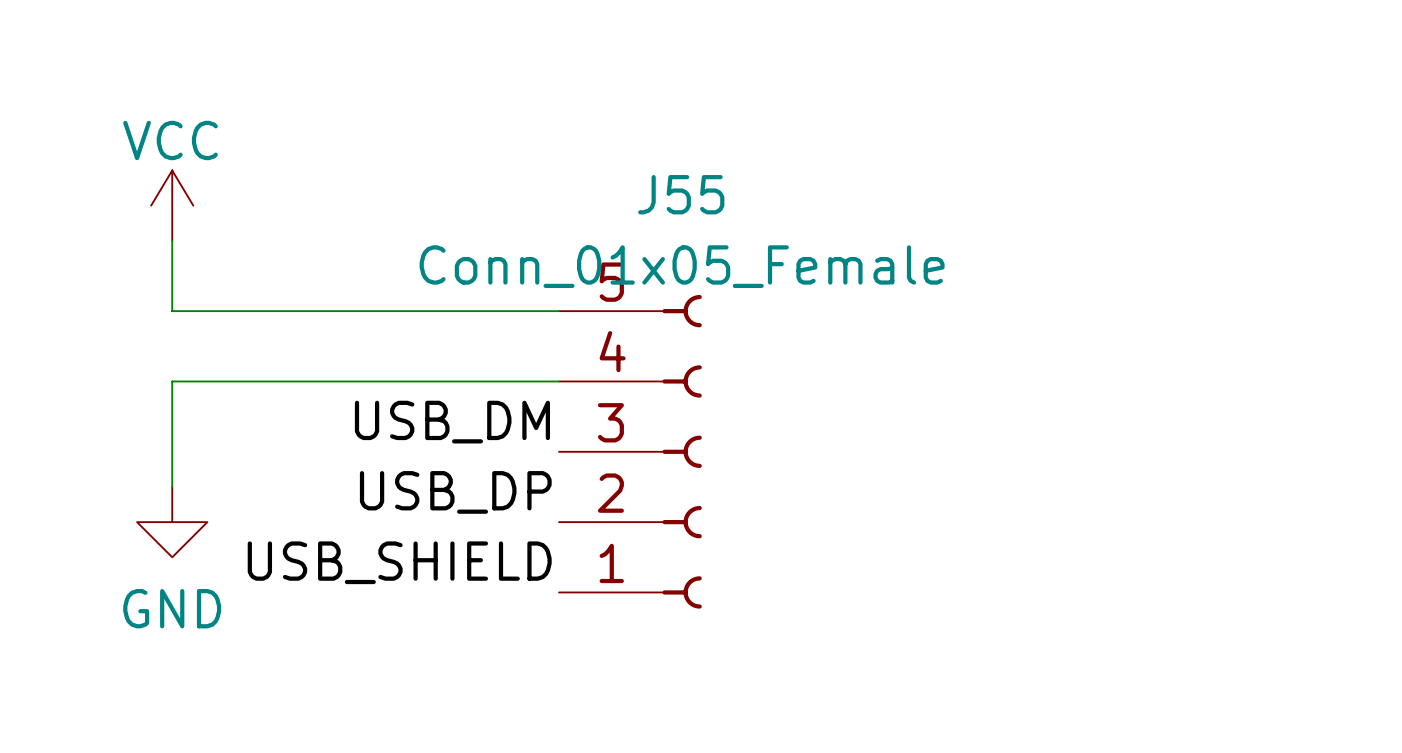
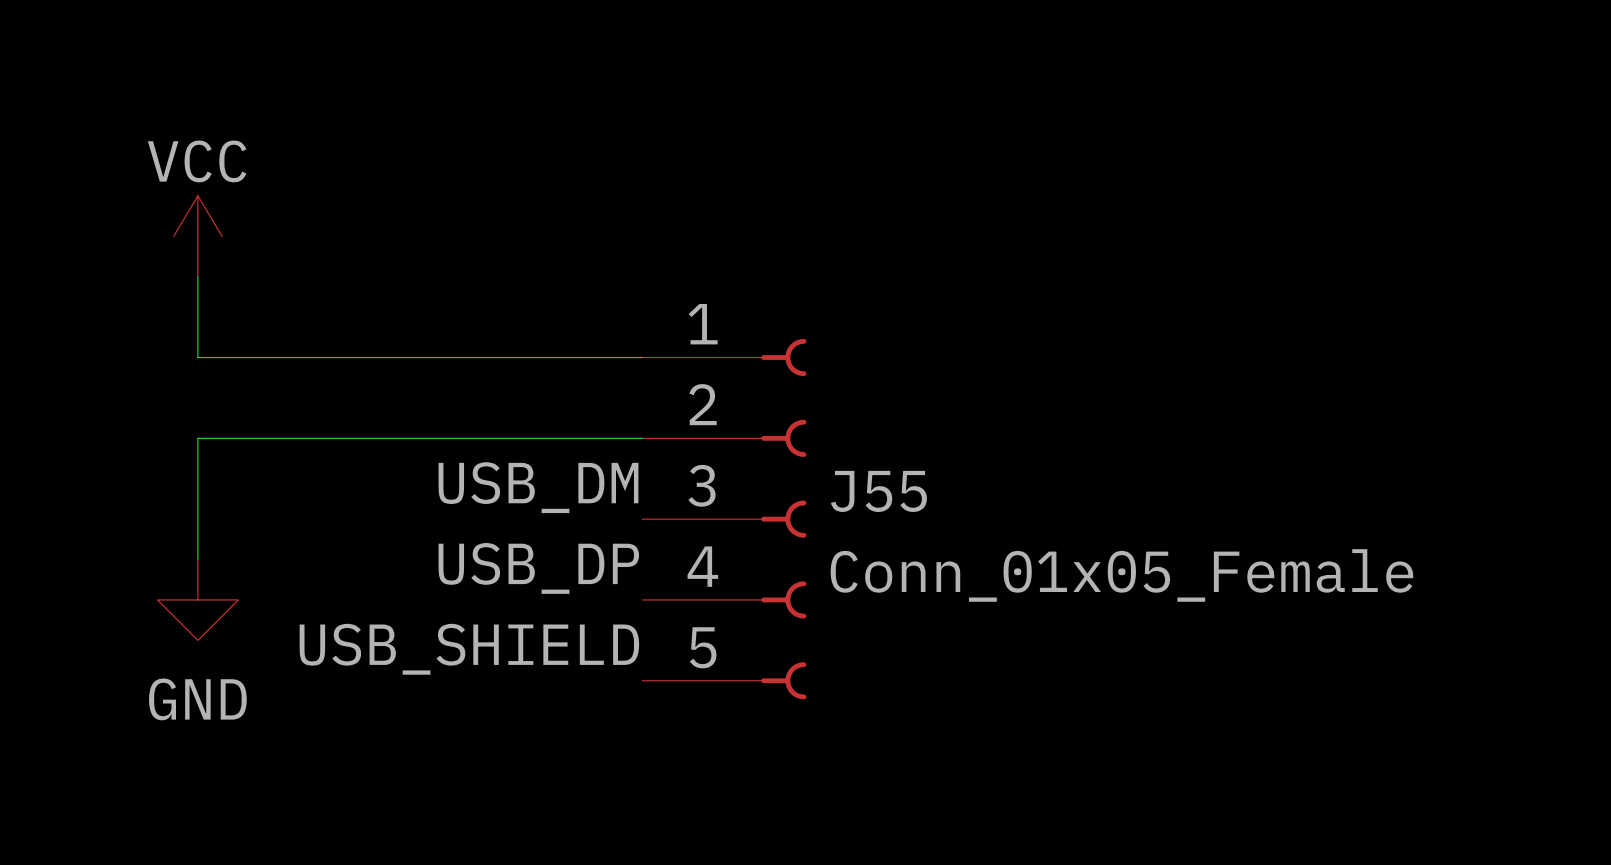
J55 name position: J55 (681, 194) -> J55 (878, 491)
J55 value position: Conn_01x05_Female (682, 266) -> Conn_01x05_Female (1121, 575)
J55 flip: as is (682, 451) -> up-down (783, 519)

